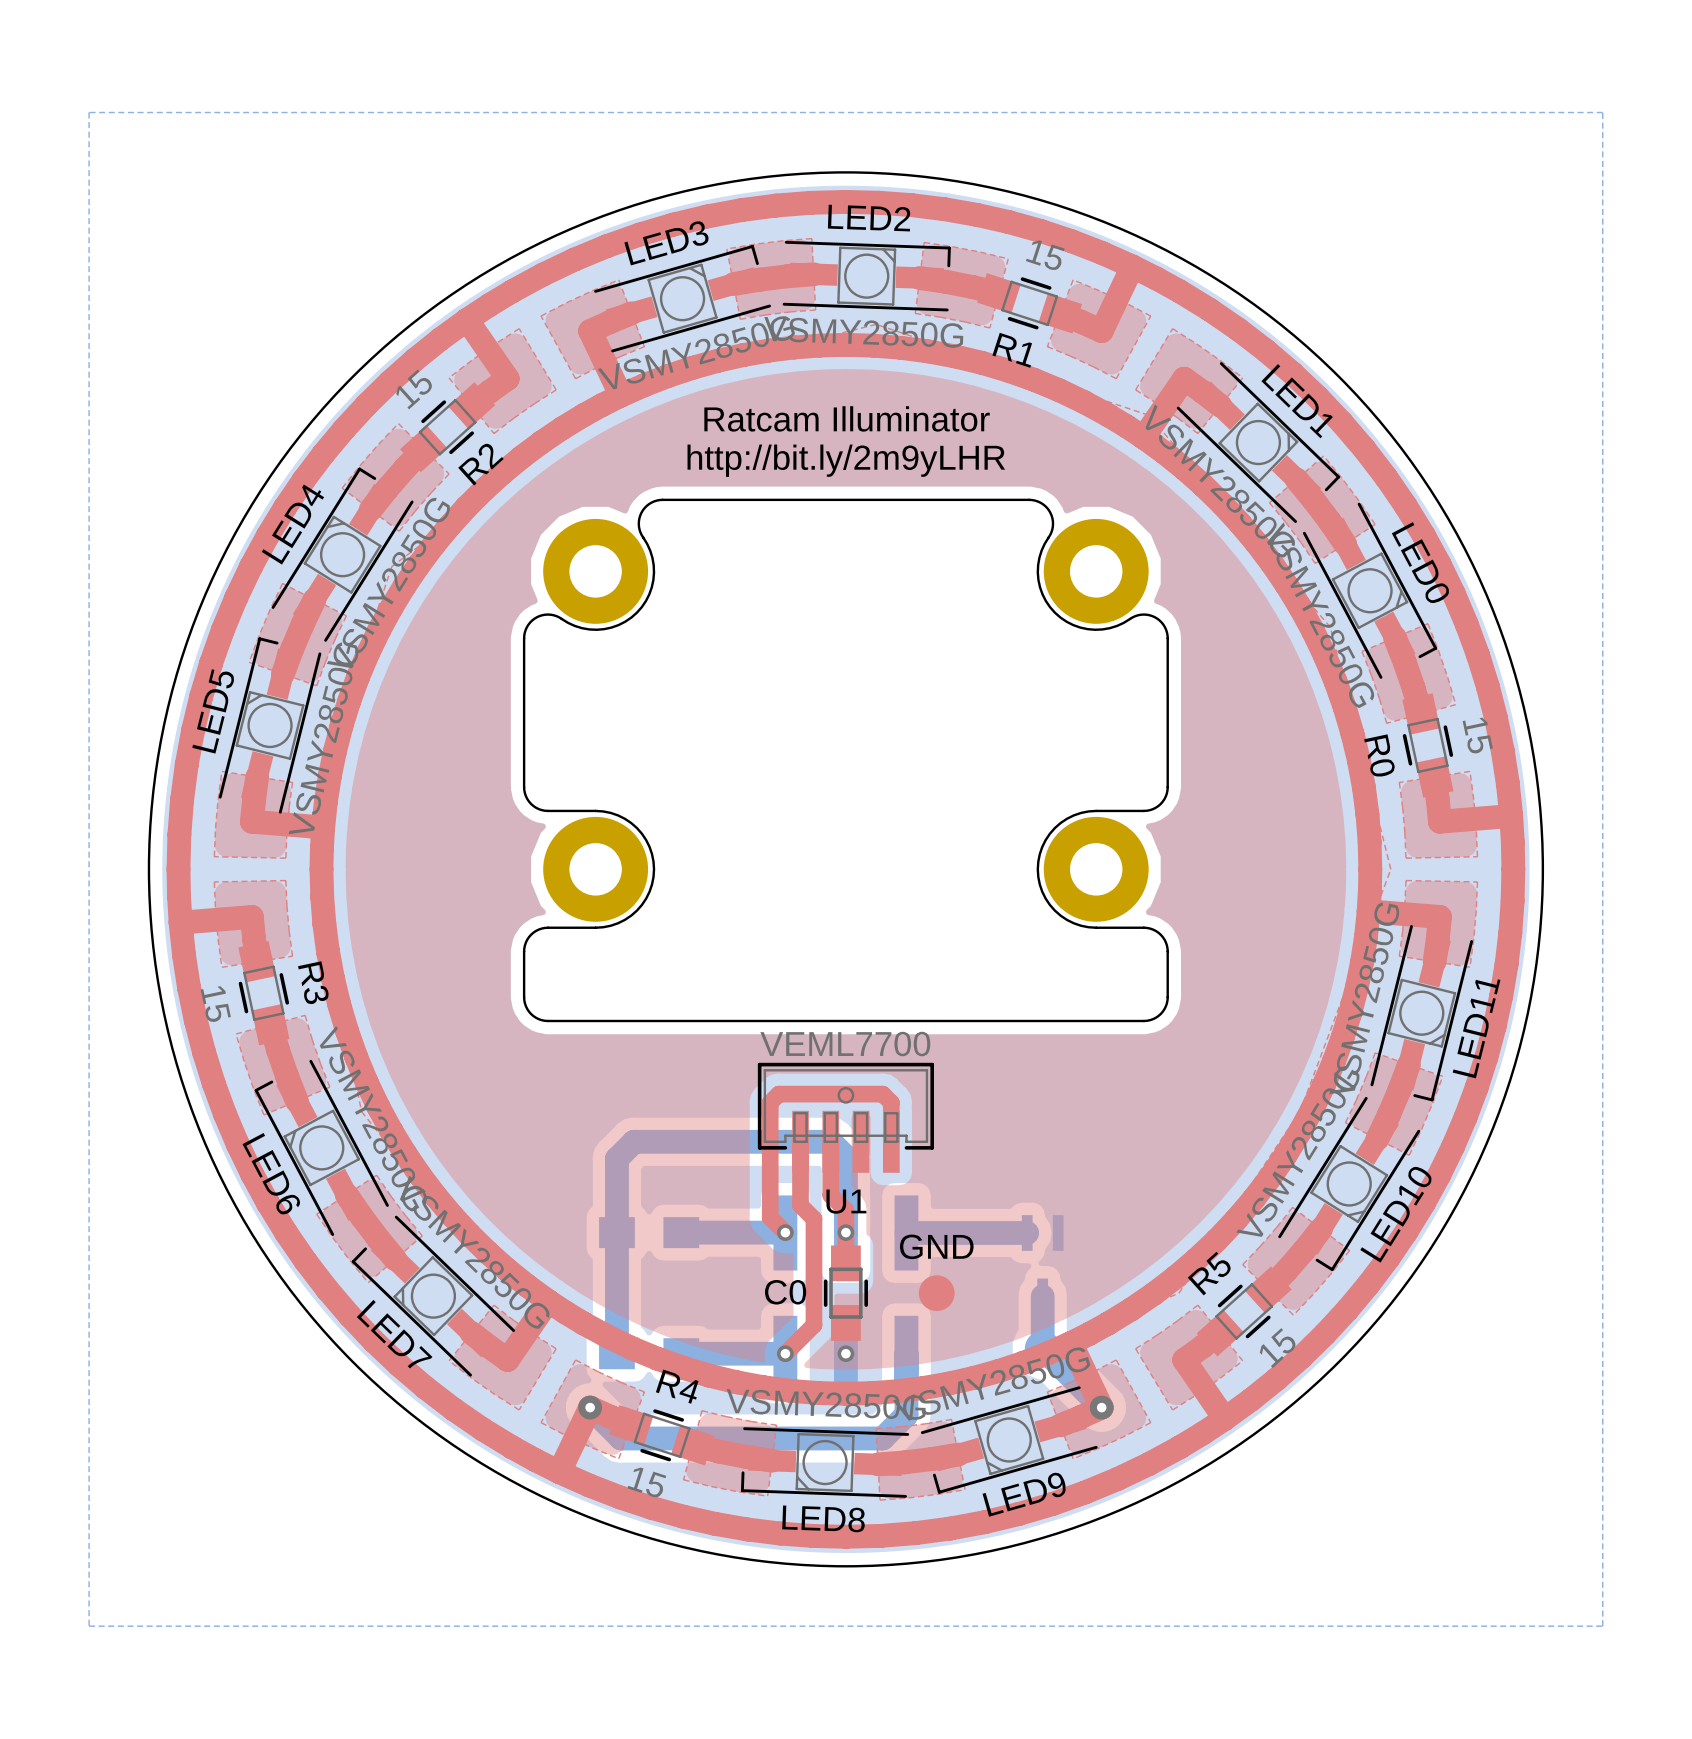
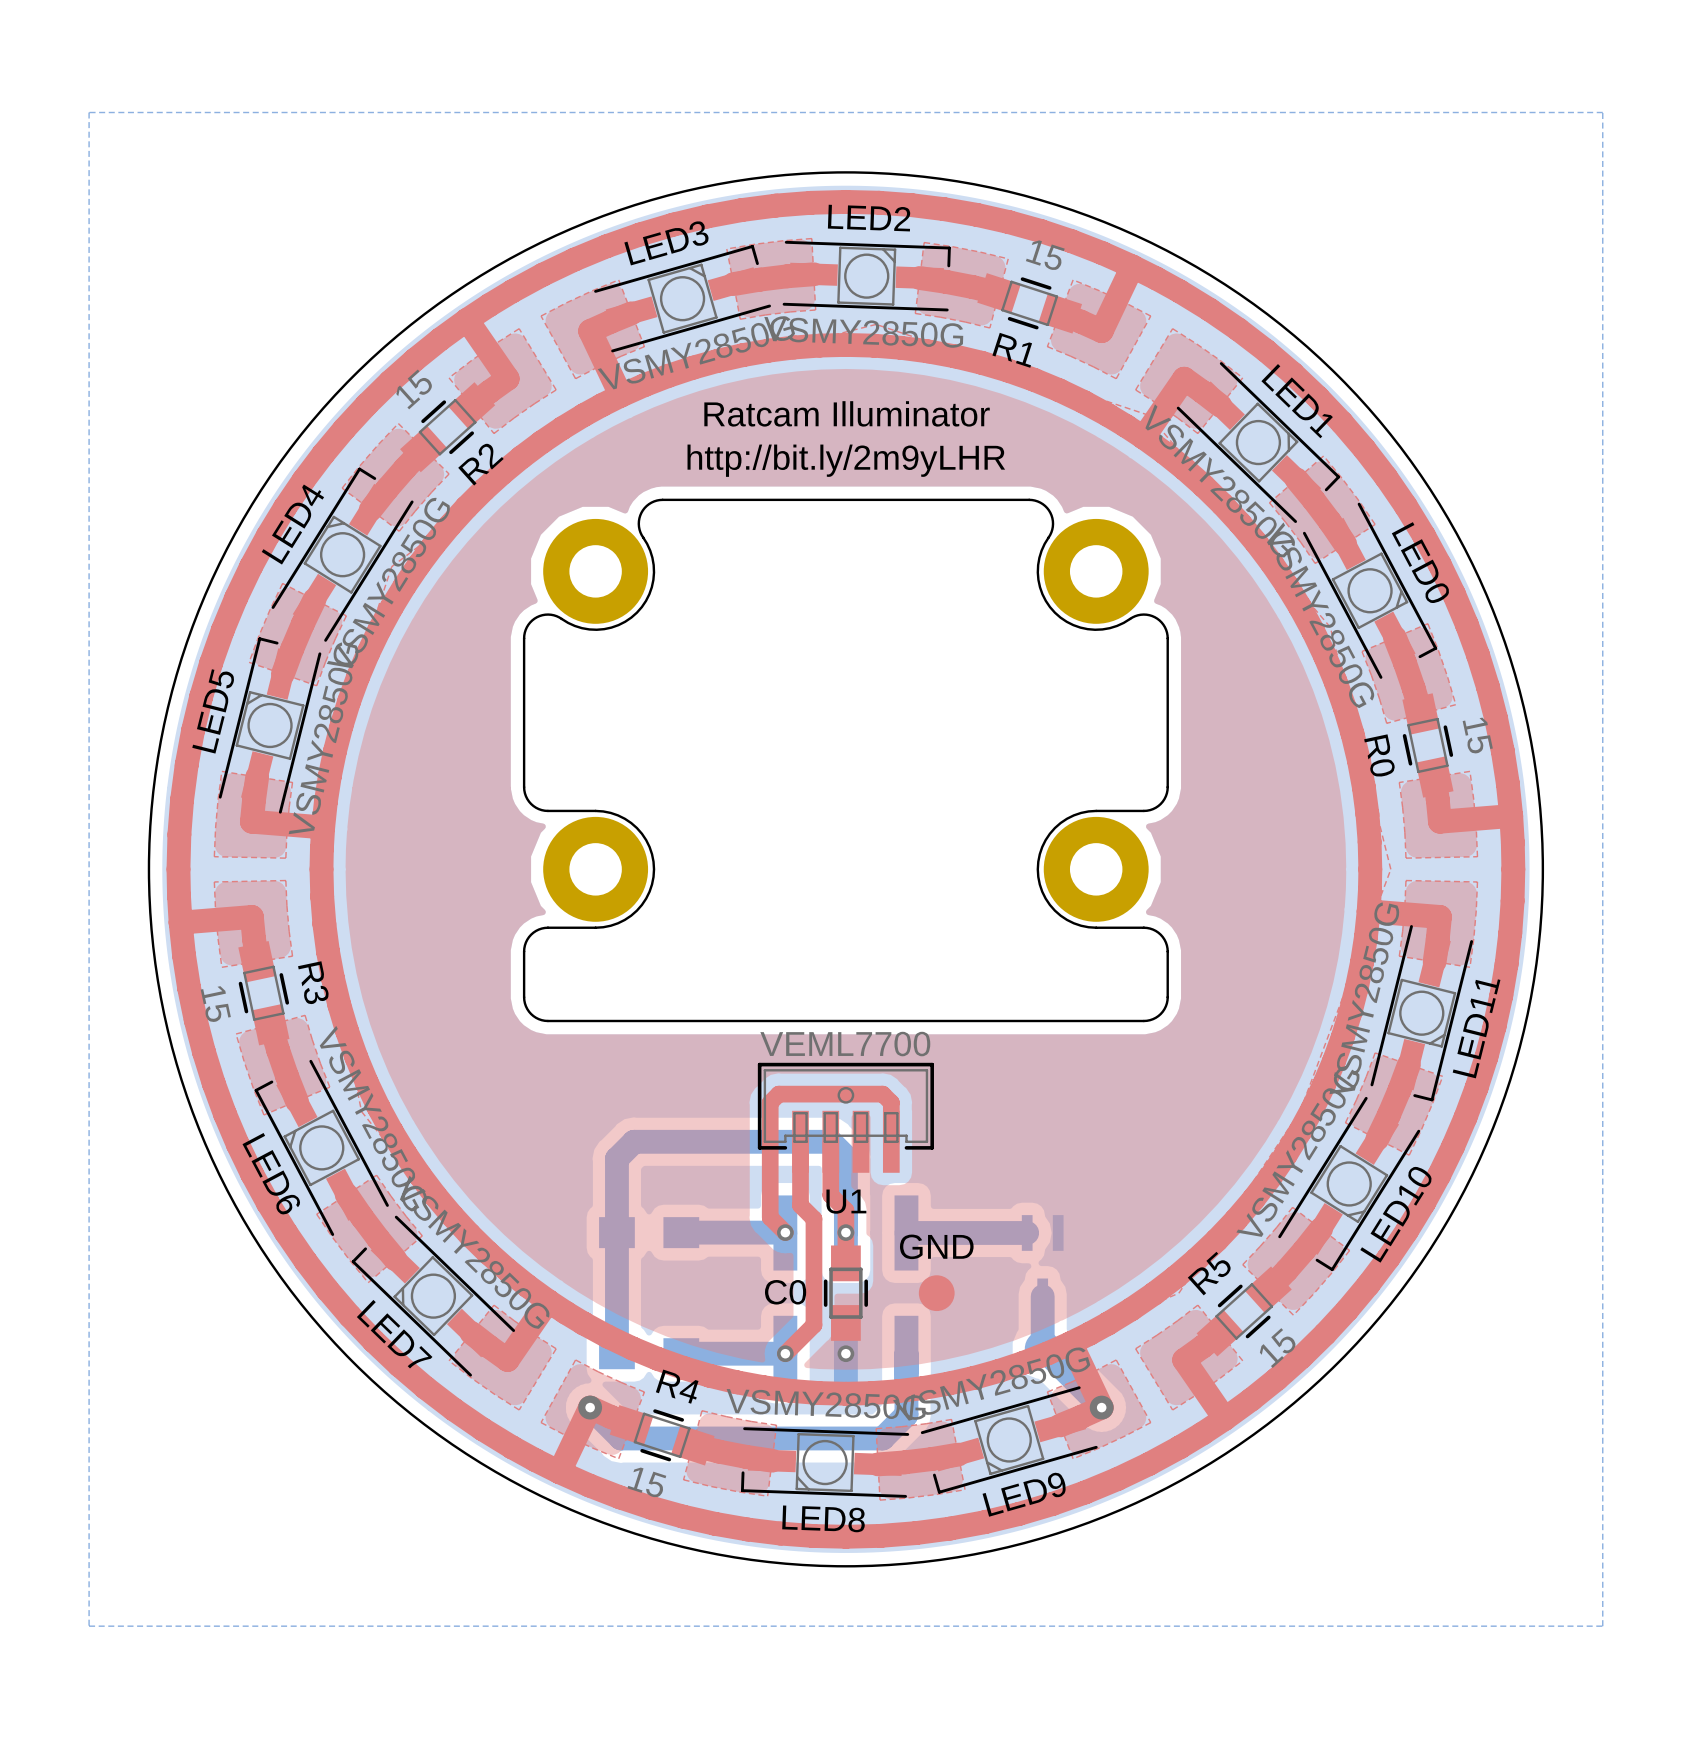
drawing: none -> [704, 401, 990, 427]
text: Ratcam Illuminator (847, 418) -> none

